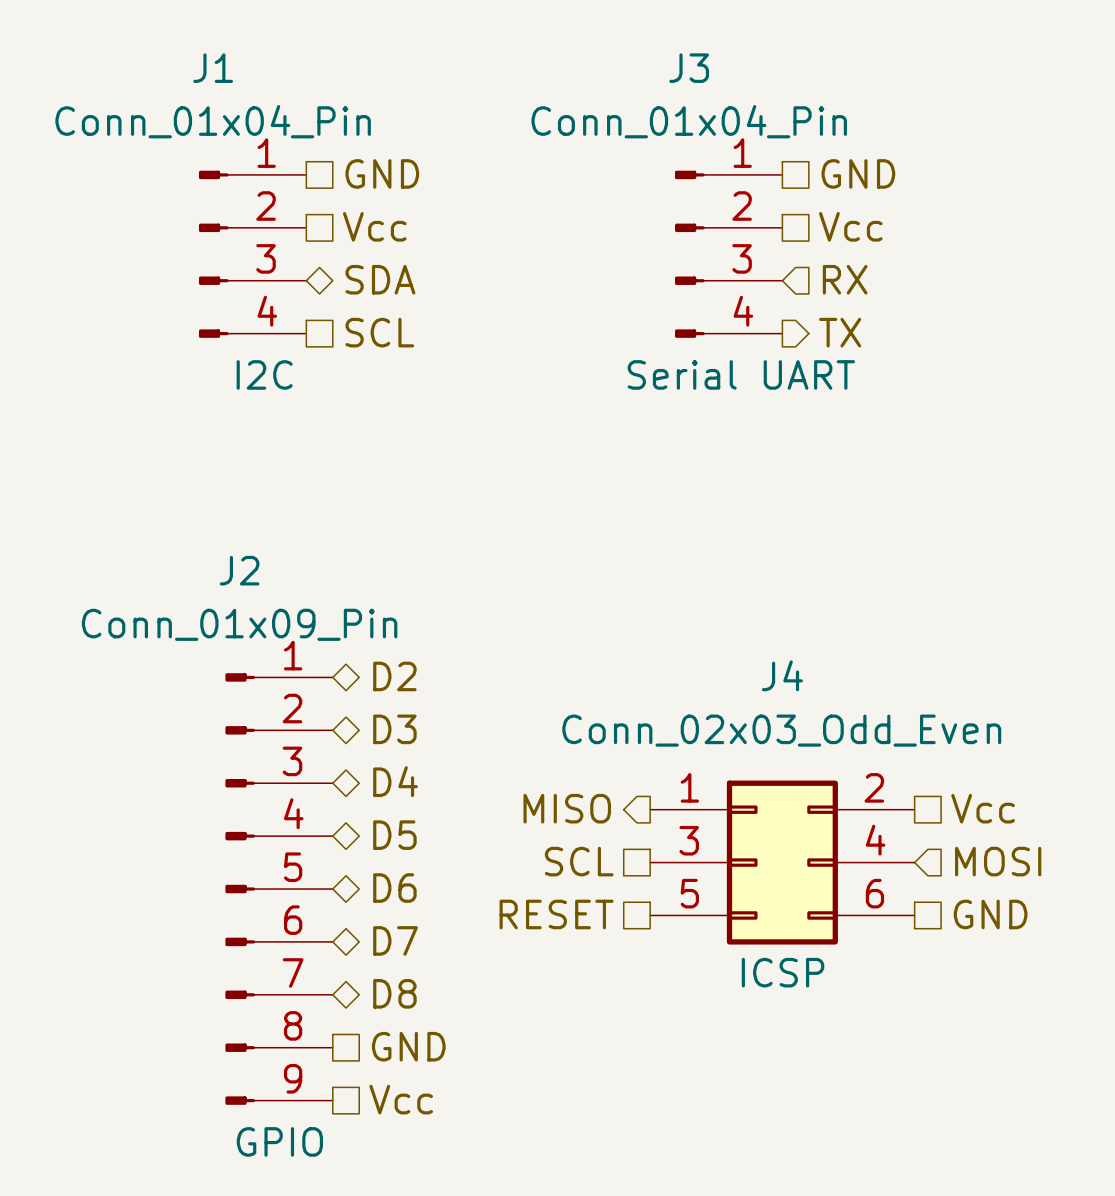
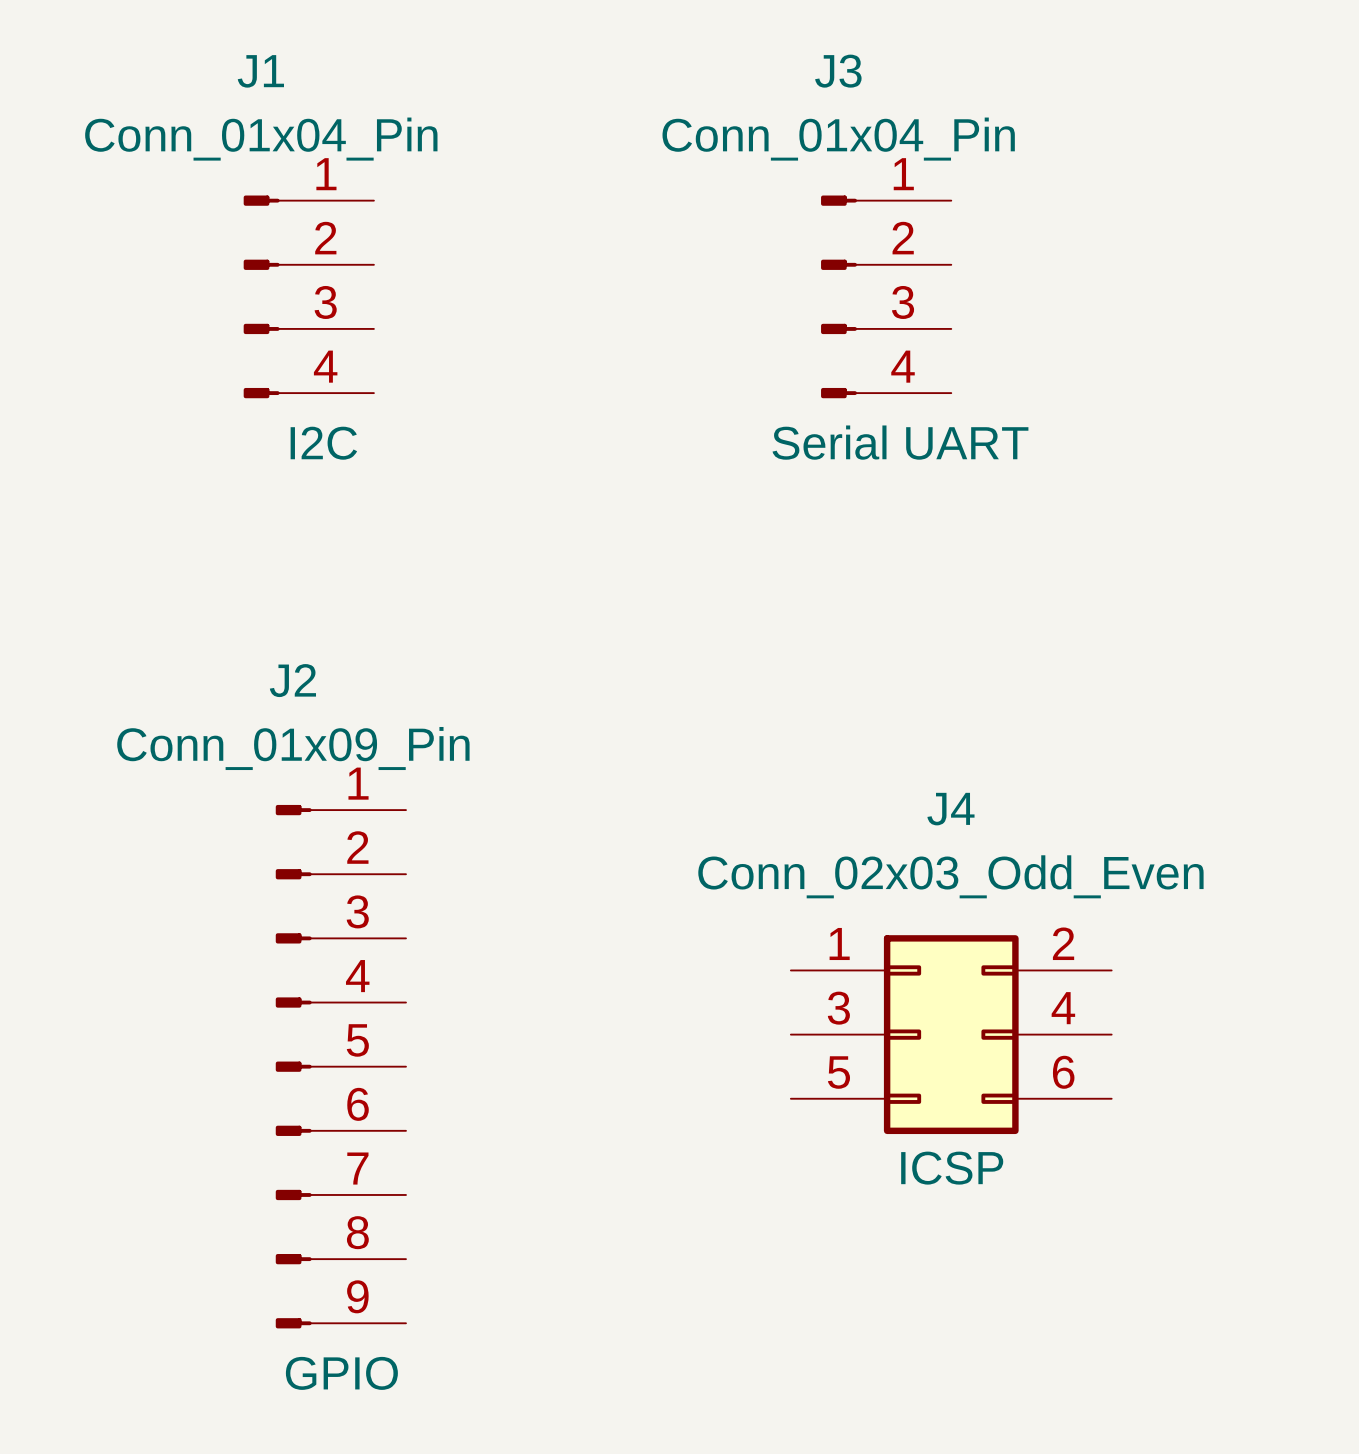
hierarchical label: GND (382, 173) -> none
hierarchical label: GND (858, 173) -> none
hierarchical label: Vcc (374, 226) -> none
hierarchical label: Vcc (850, 226) -> none
hierarchical label: SDA (380, 279) -> none
hierarchical label: RX (845, 279) -> none
hierarchical label: SCL (379, 332) -> none
hierarchical label: TX (840, 332) -> none
hierarchical label: D2 (394, 676) -> none
hierarchical label: D3 (394, 729) -> none
hierarchical label: D4 (395, 781) -> none
hierarchical label: MISO (567, 808) -> none
hierarchical label: Vcc (983, 808) -> none
hierarchical label: D5 (394, 835) -> none
hierarchical label: SCL (579, 861) -> none
hierarchical label: MOSI (998, 861) -> none
hierarchical label: D6 (394, 888) -> none
hierarchical label: RESET (556, 914) -> none
hierarchical label: GND (990, 914) -> none
hierarchical label: D7 (395, 940) -> none
hierarchical label: D8 (394, 993) -> none
hierarchical label: GND (408, 1046) -> none
hierarchical label: Vcc (401, 1099) -> none

